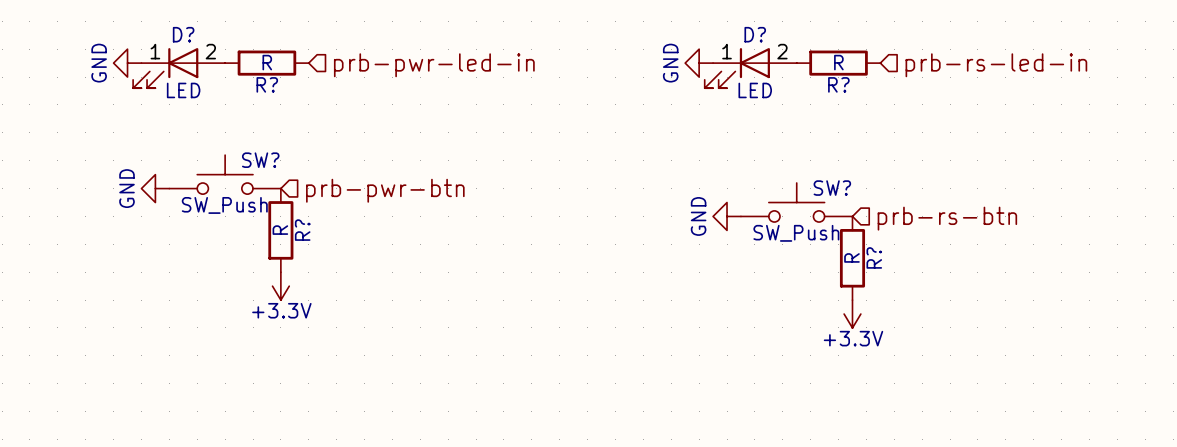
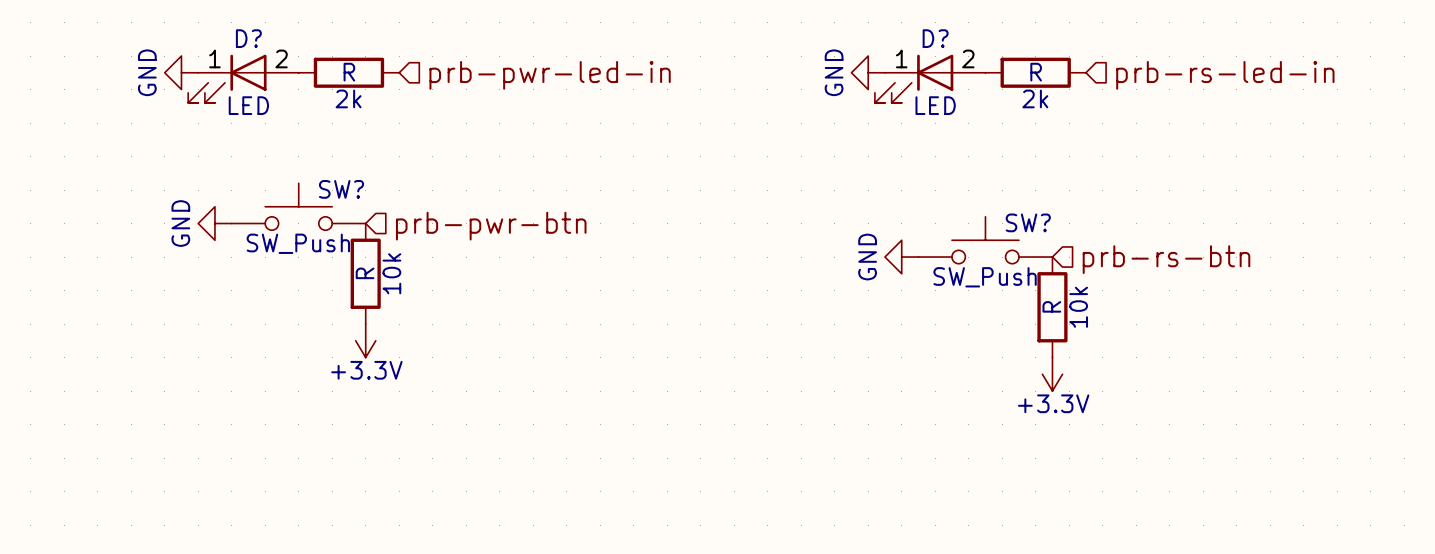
R? name: R? (267, 84) -> 2k (348, 98)
R? name: R? (838, 84) -> 2k (1035, 98)
R? name: R? (302, 230) -> 10k (391, 273)
R? name: R? (874, 257) -> 10k (1078, 307)

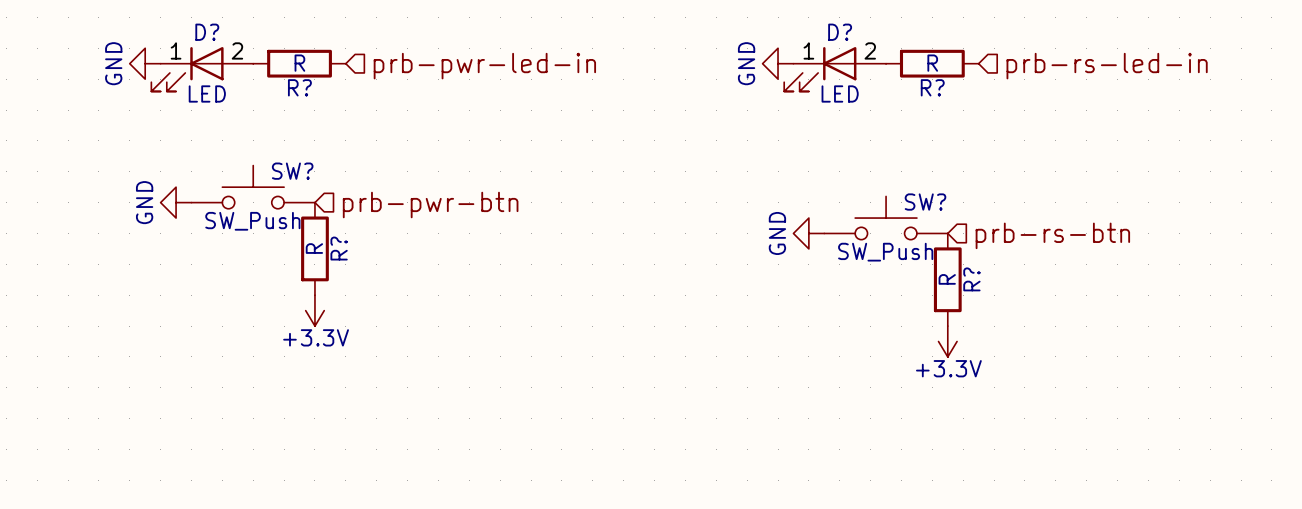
2k name: 2k (348, 98) -> R? (299, 87)
2k name: 2k (1035, 98) -> R? (932, 87)
10k name: 10k (391, 273) -> R? (339, 248)
10k name: 10k (1078, 307) -> R? (971, 279)

